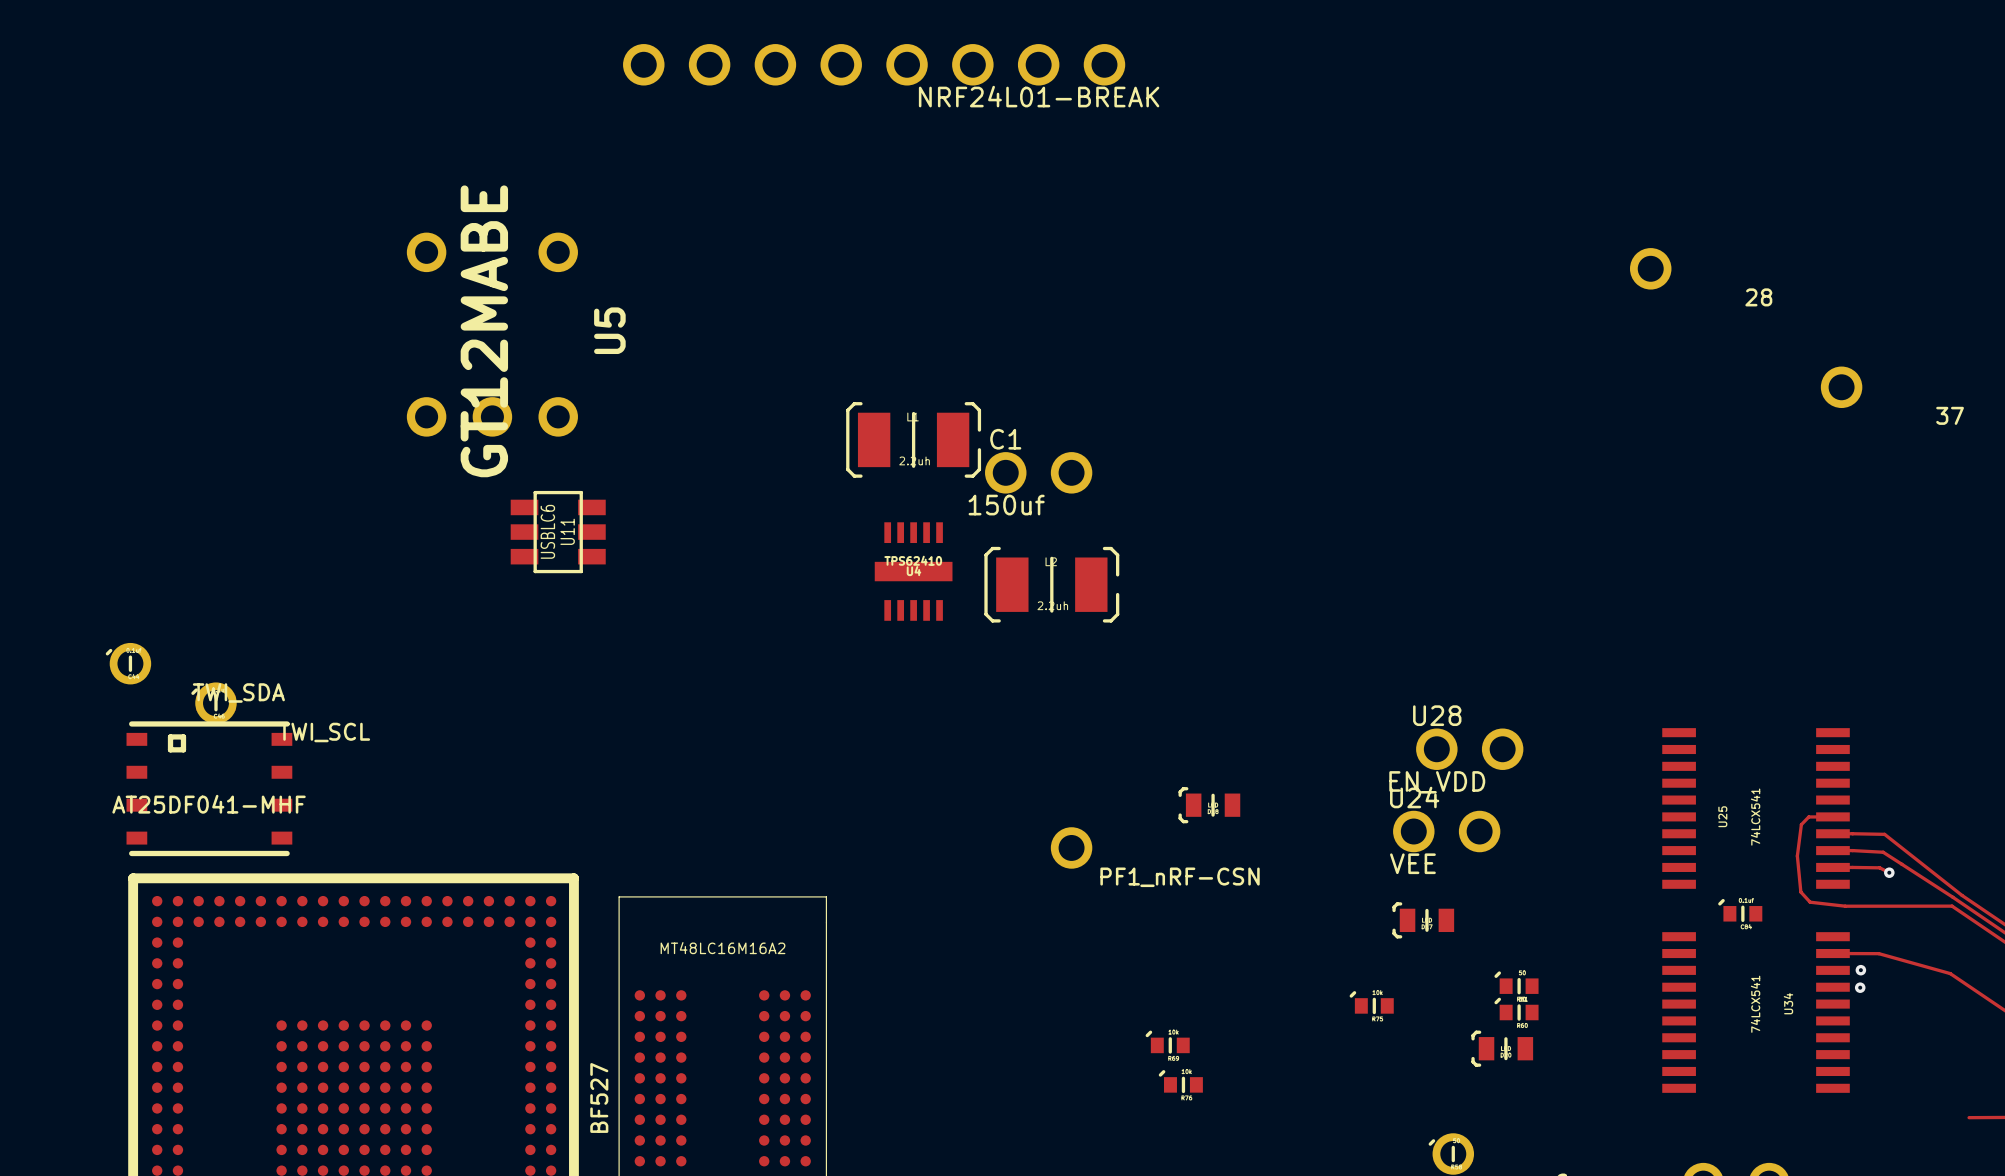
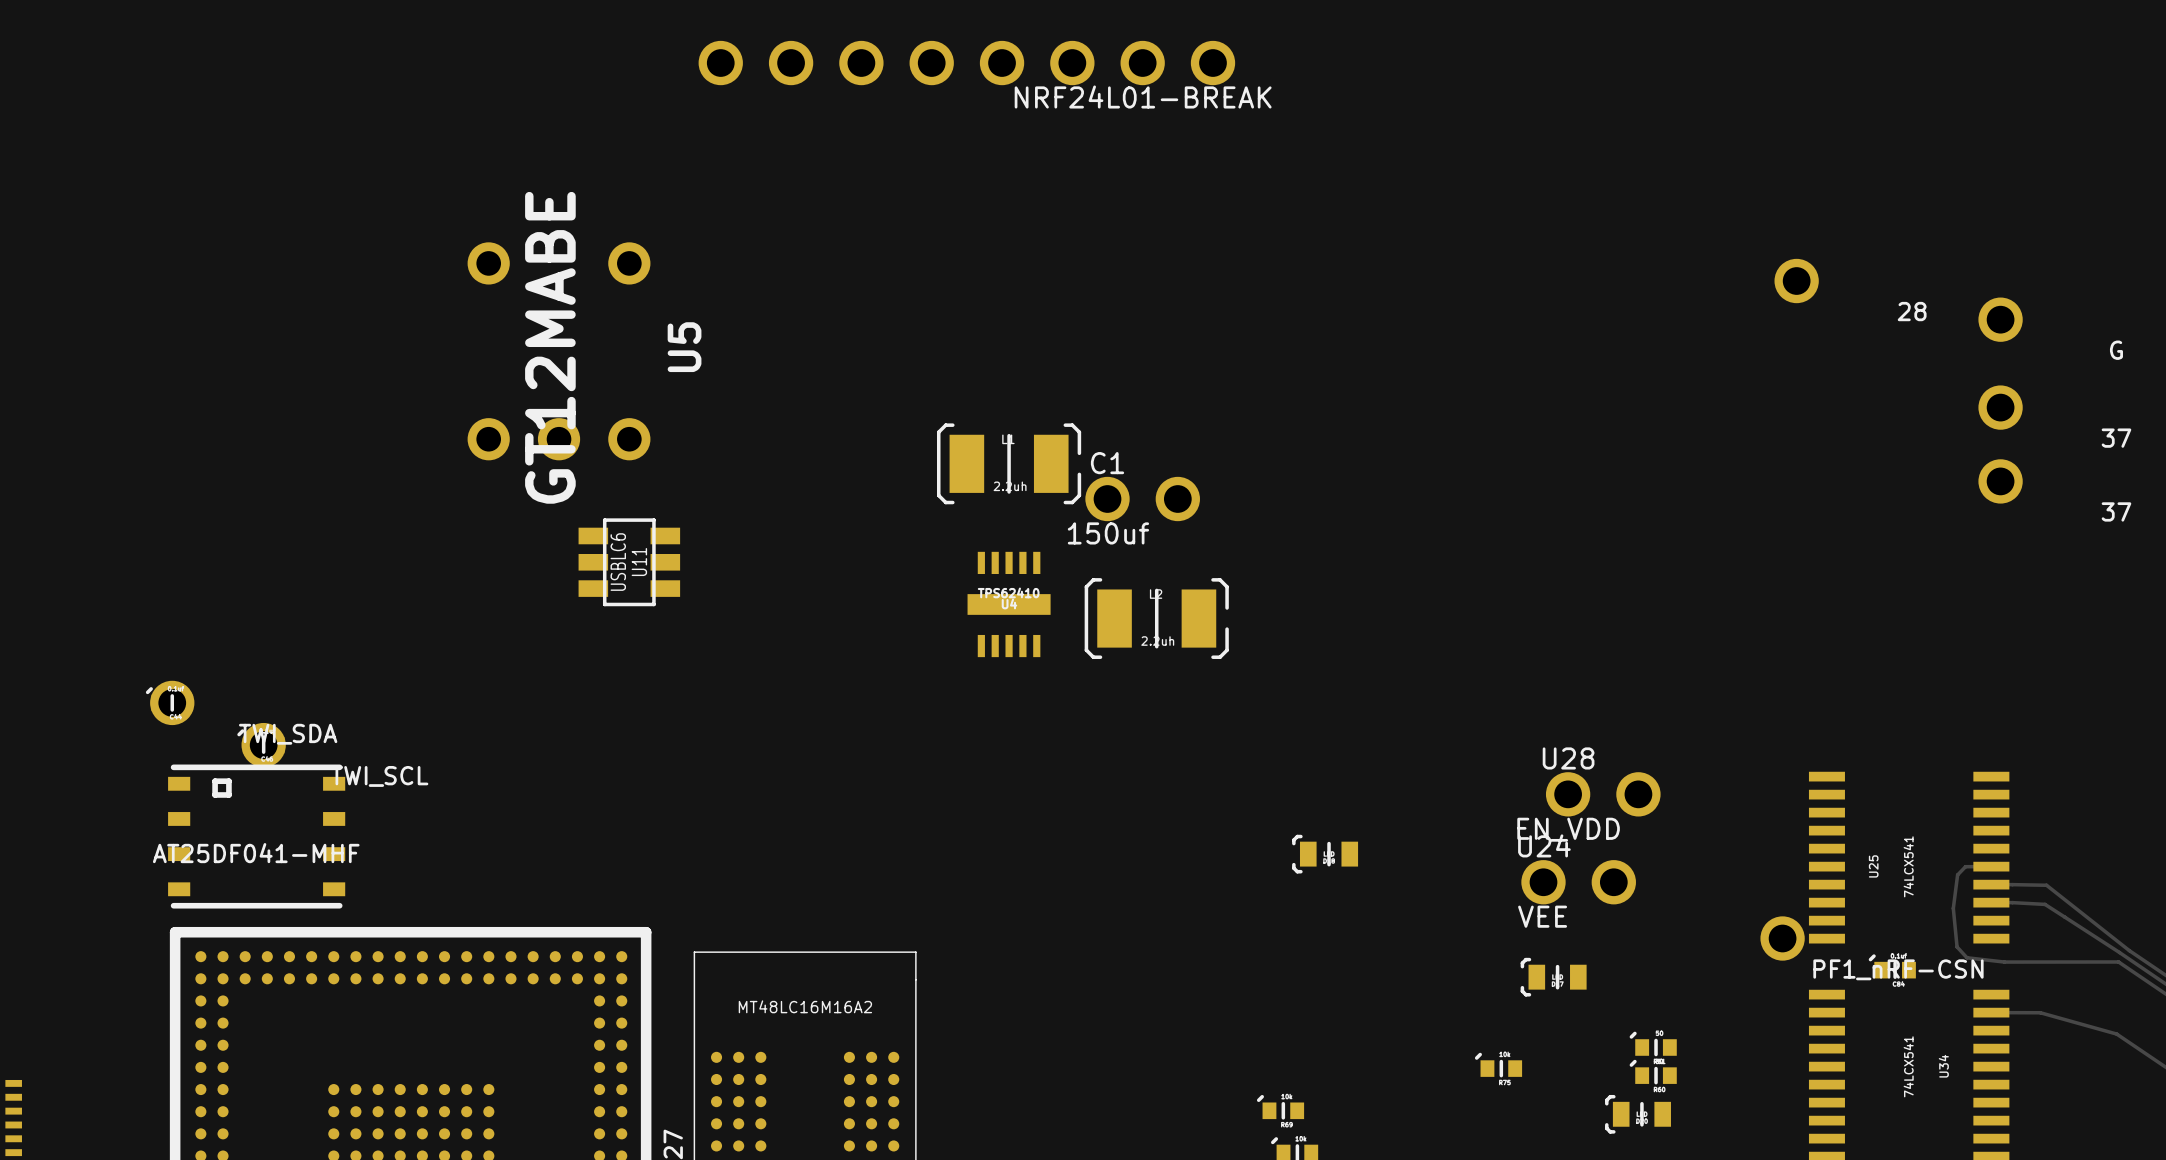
part: none -> G (2000, 319)
part: none -> 37 (2000, 481)
part position: (1071, 847) -> (1782, 938)
track: (1832, 867) (1879, 867) (1889, 872) -> none
via: (1889, 872) -> none
via: (1860, 970) -> none
via: (1860, 987) -> none

